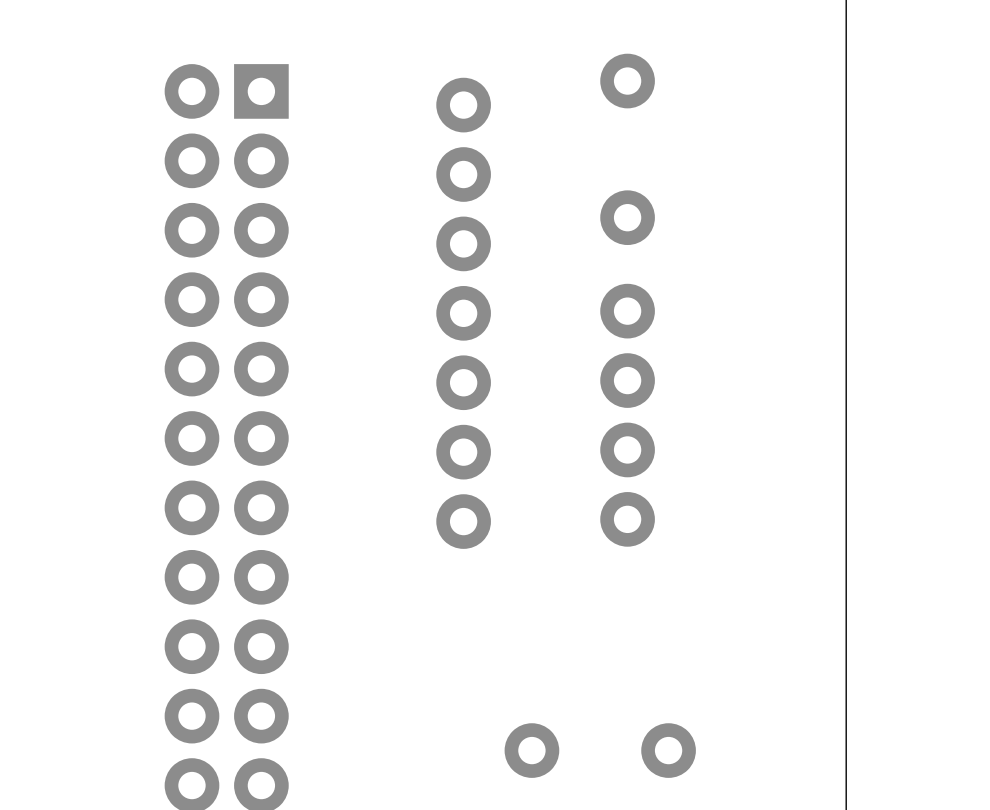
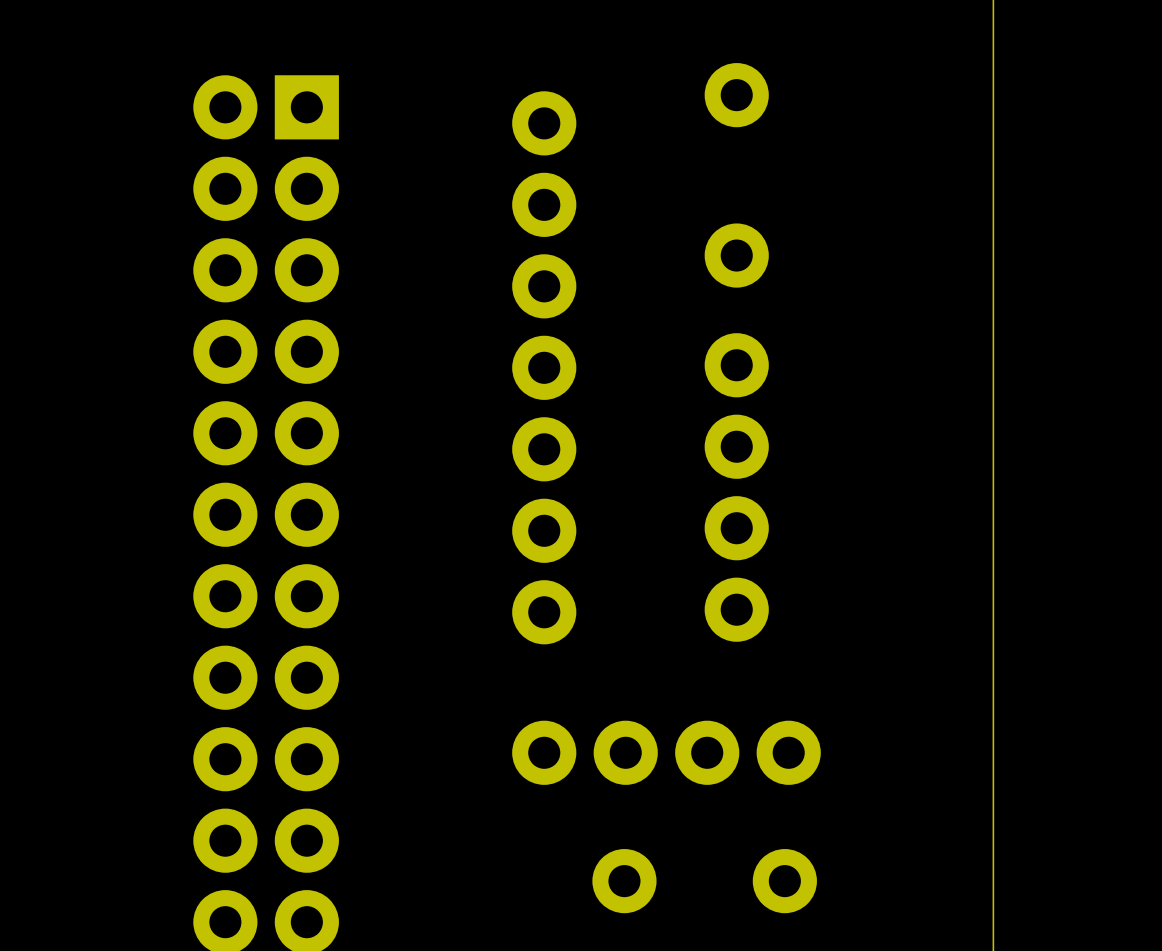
part: none -> (666, 752)

